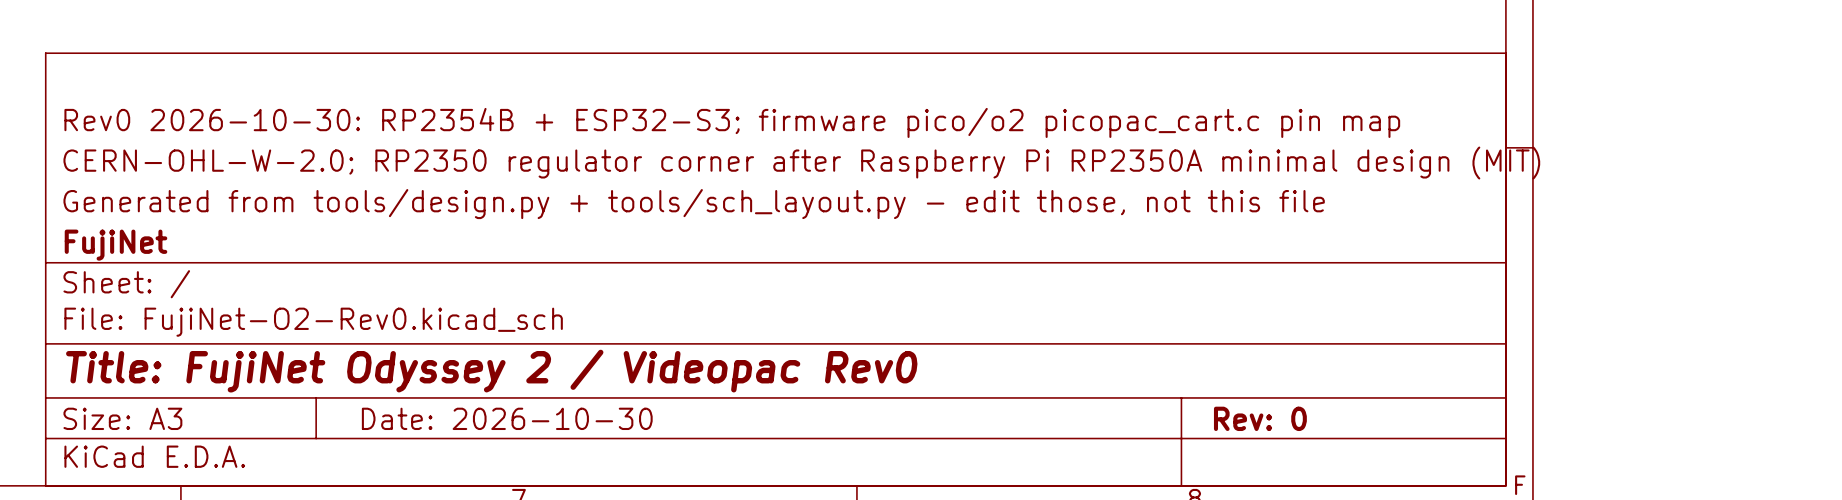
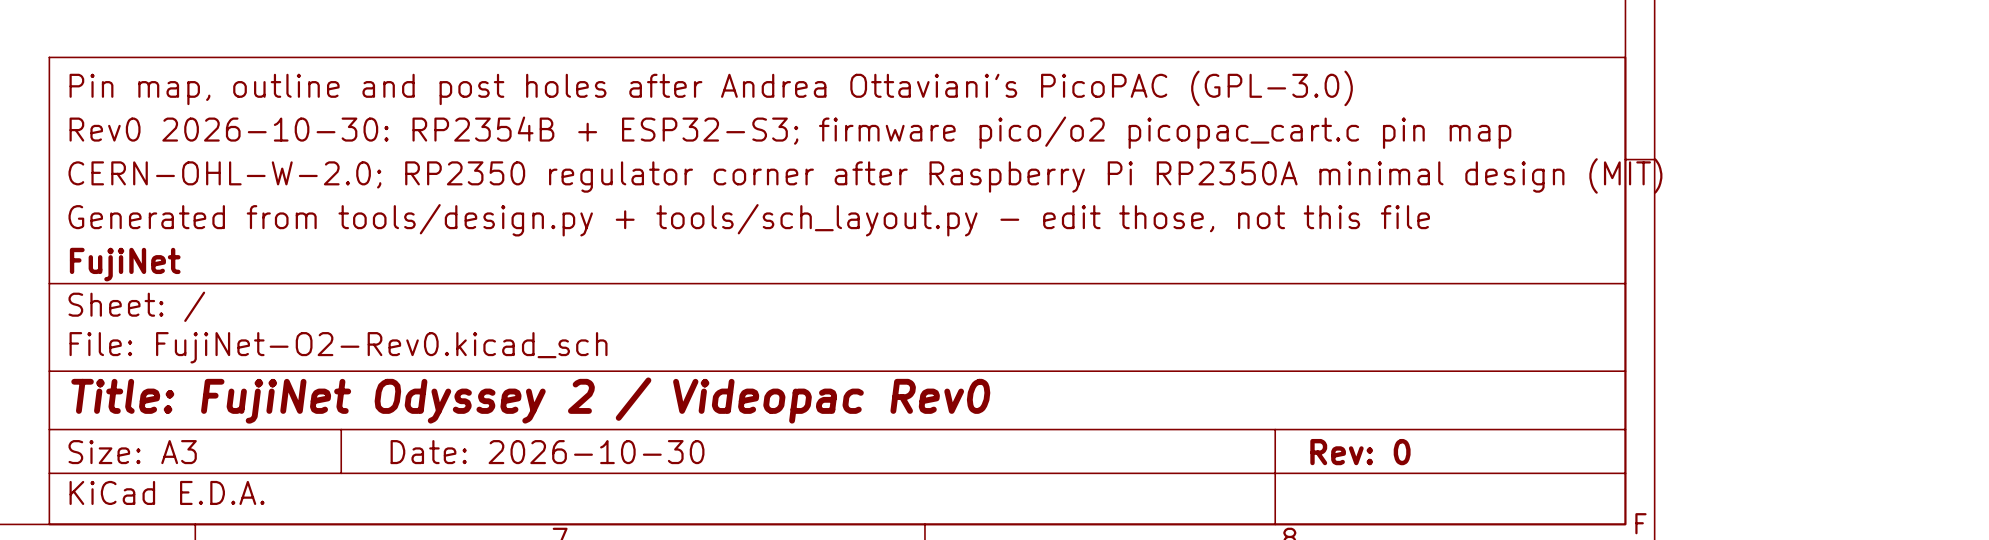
title block: none -> Pin map, outline and post holes after Andrea Ottaviani's PicoPAC (GPL-3.0) (711, 88)

